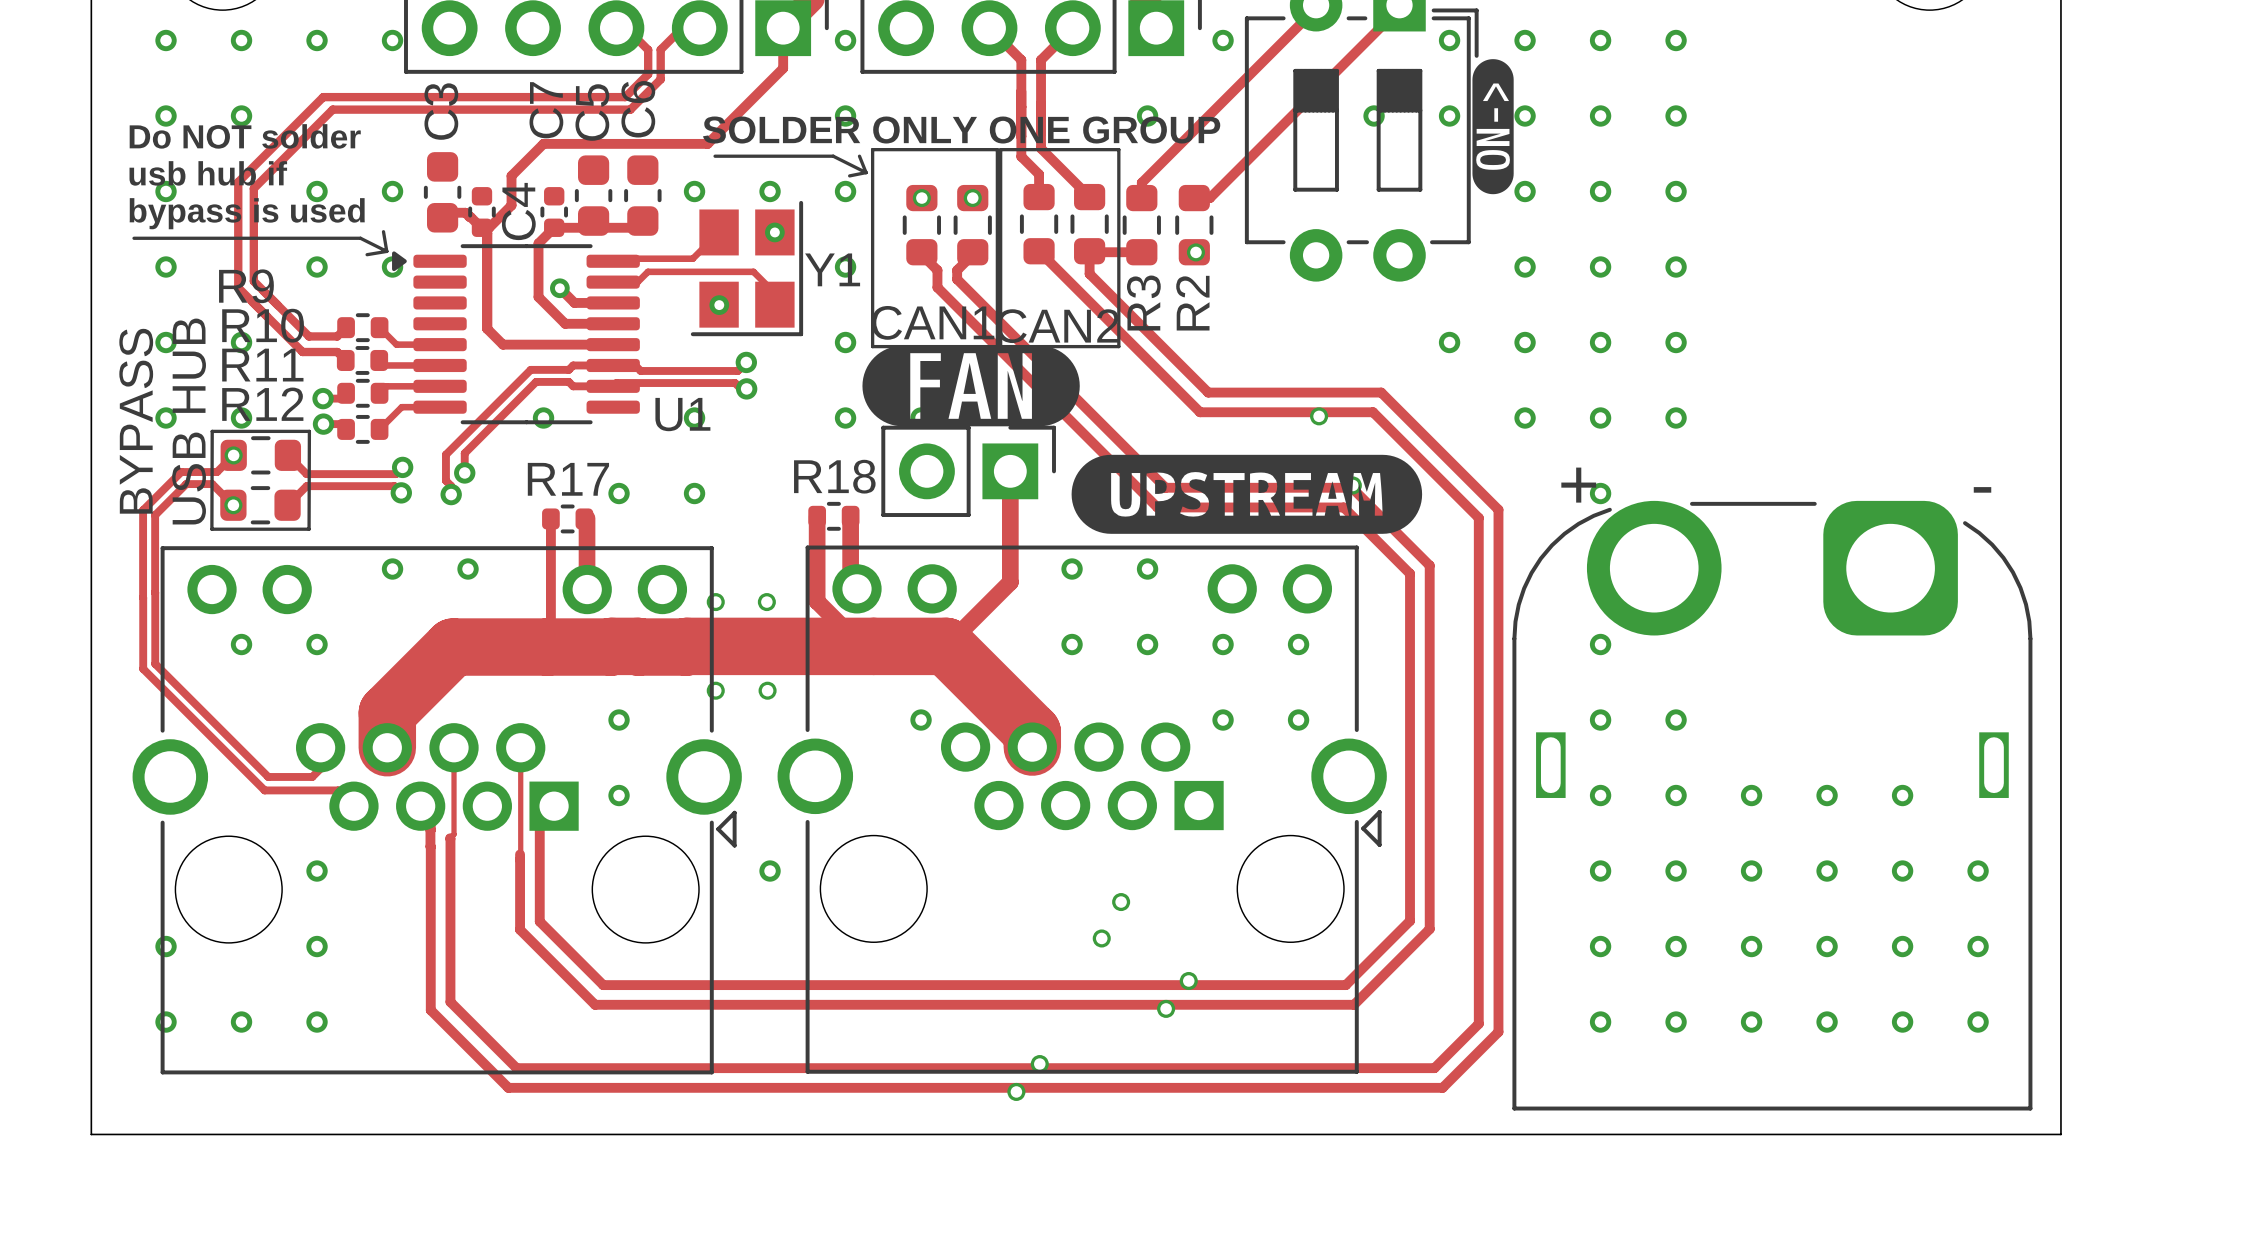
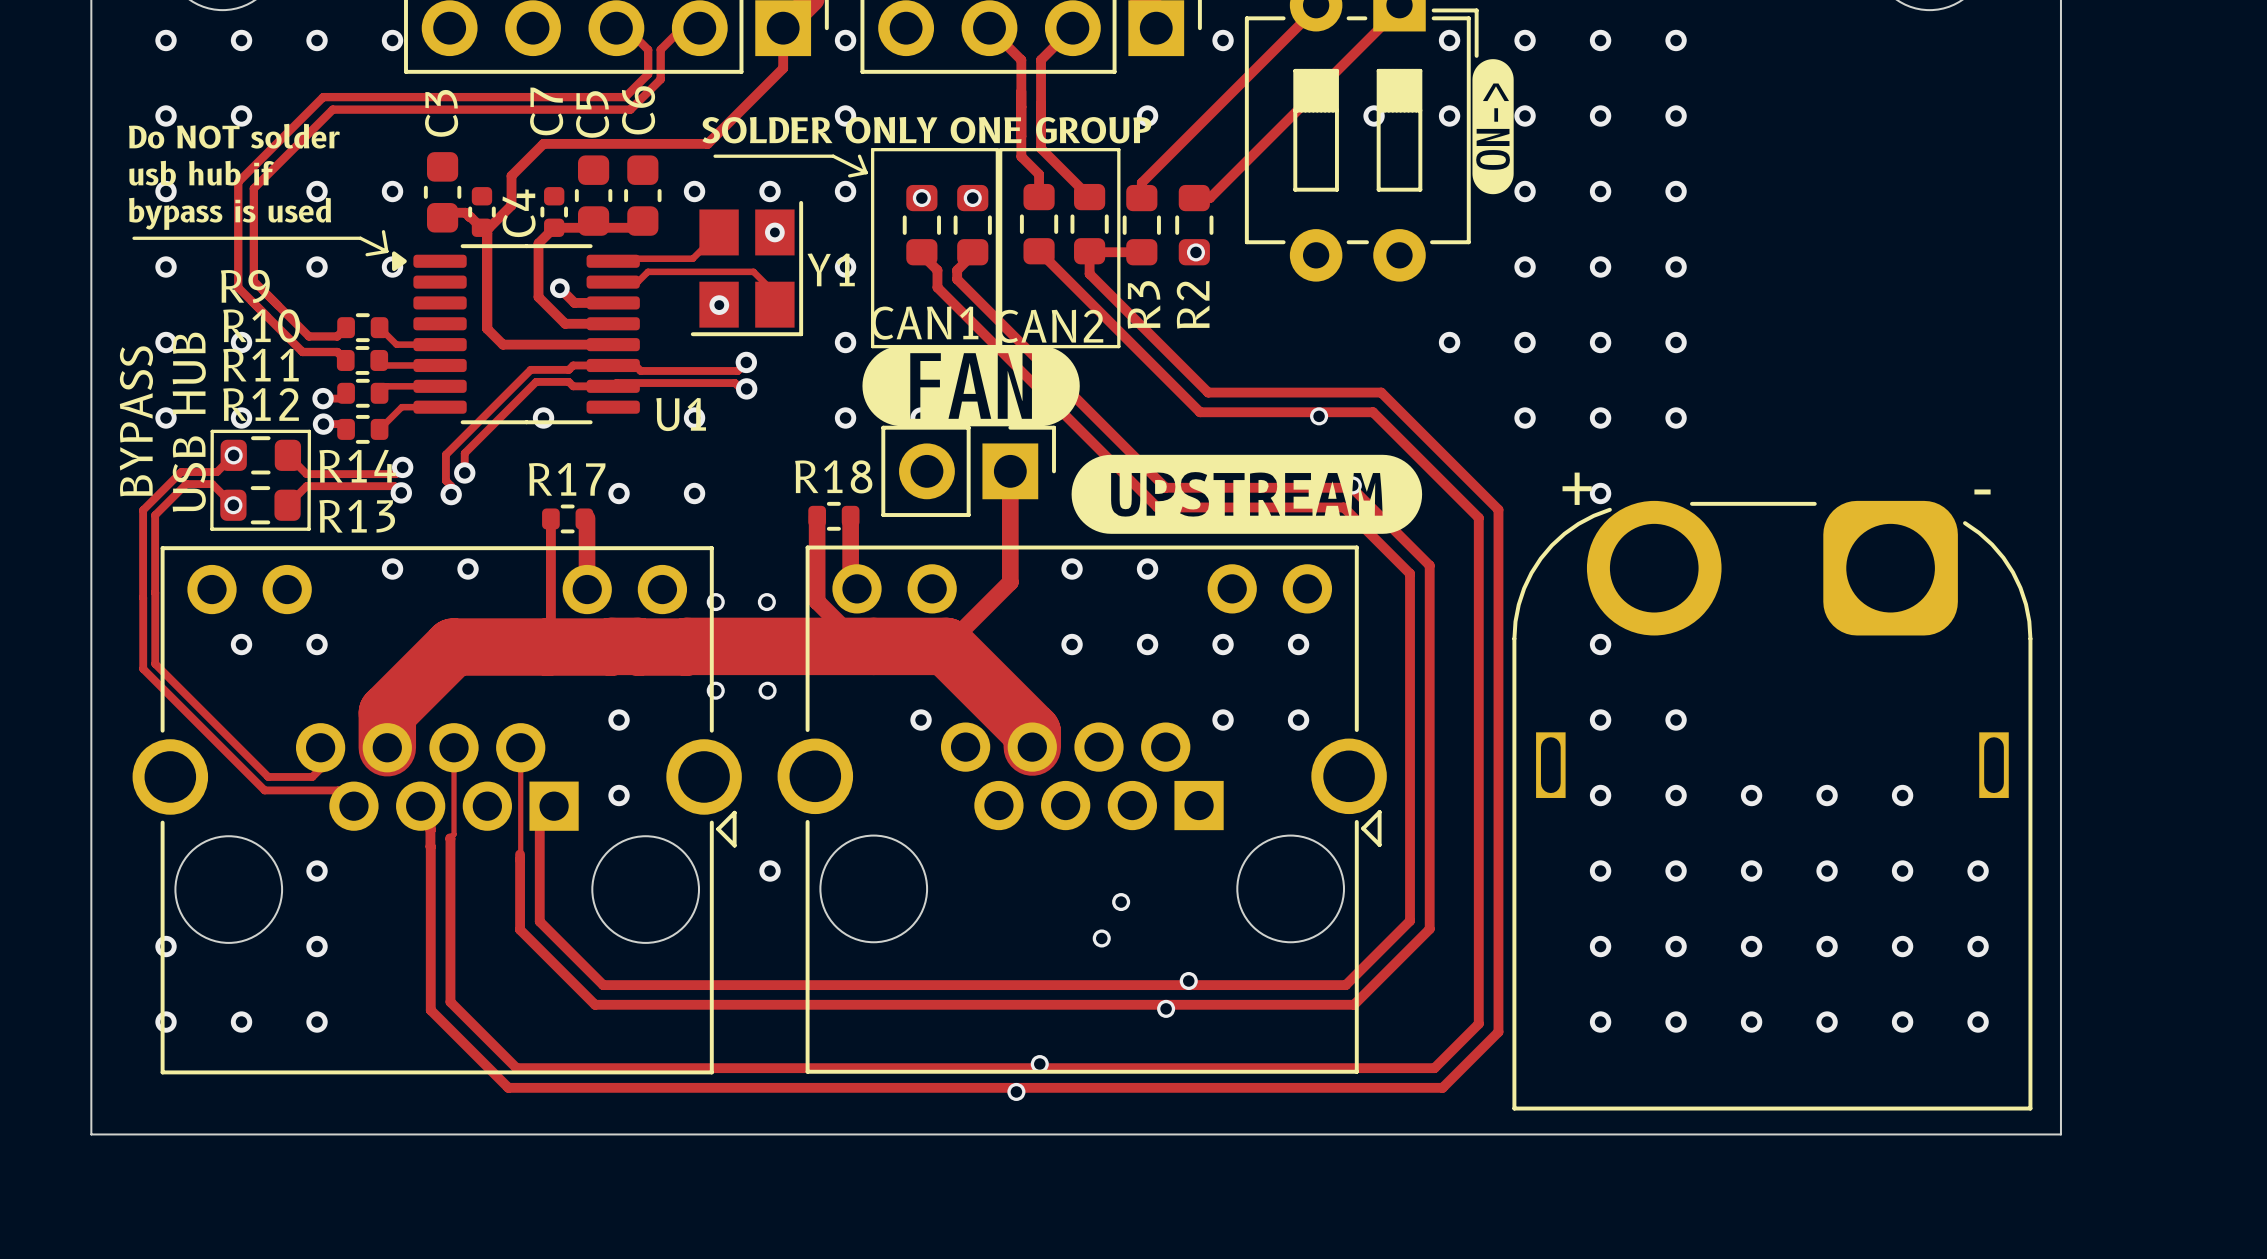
R14 name: none -> R14 (357, 466)
R13 name: none -> R13 (357, 516)

